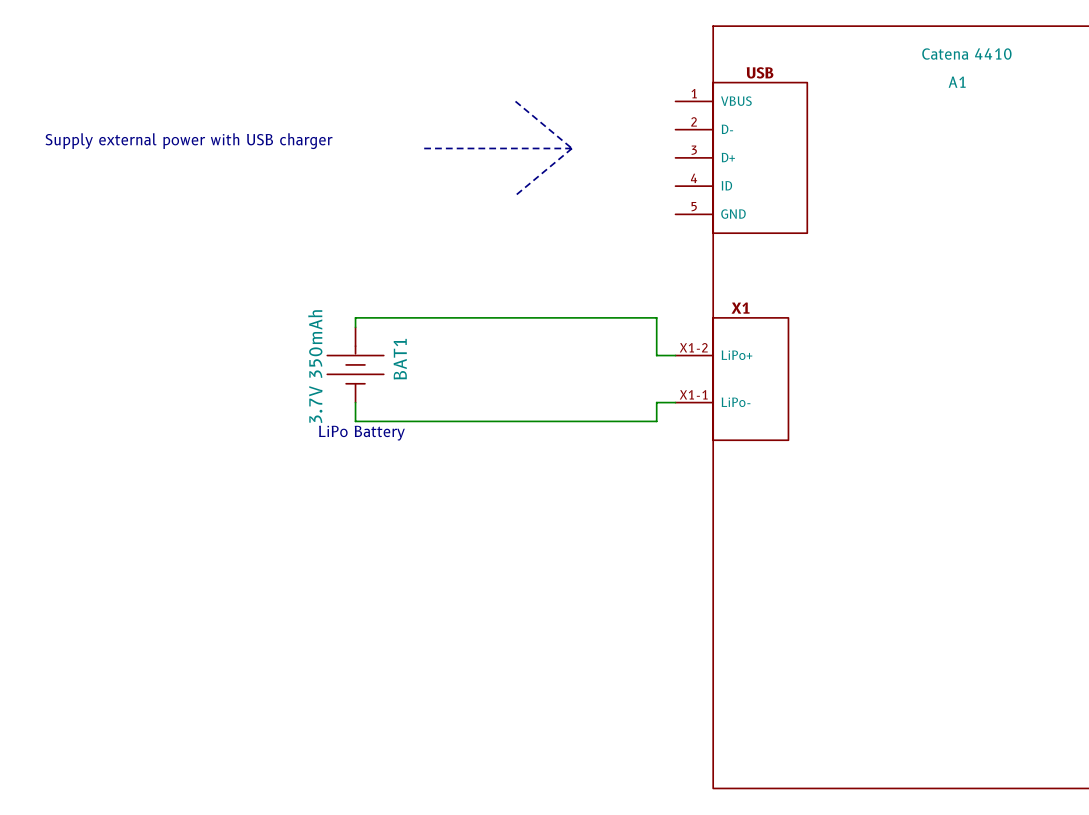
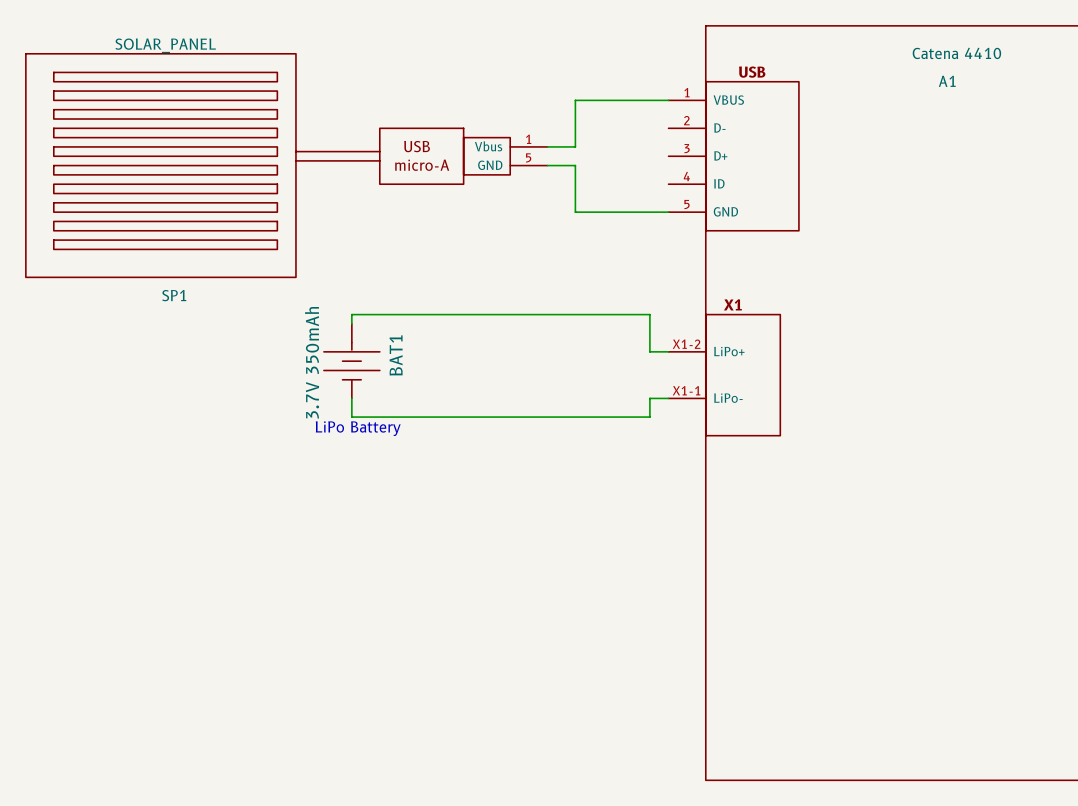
line: (515, 101) (572, 148) -> none
wire: none -> (668, 100) (575, 100) (575, 146) (547, 146)
text: Supply external power with USB charger (189, 141) -> none
line: (421, 148) (572, 148) -> none
line: (572, 148) (515, 195) -> none
SP1: none -> SOLAR_PANEL (286, 165)
wire: none -> (547, 165) (575, 165) (575, 212) (668, 212)

